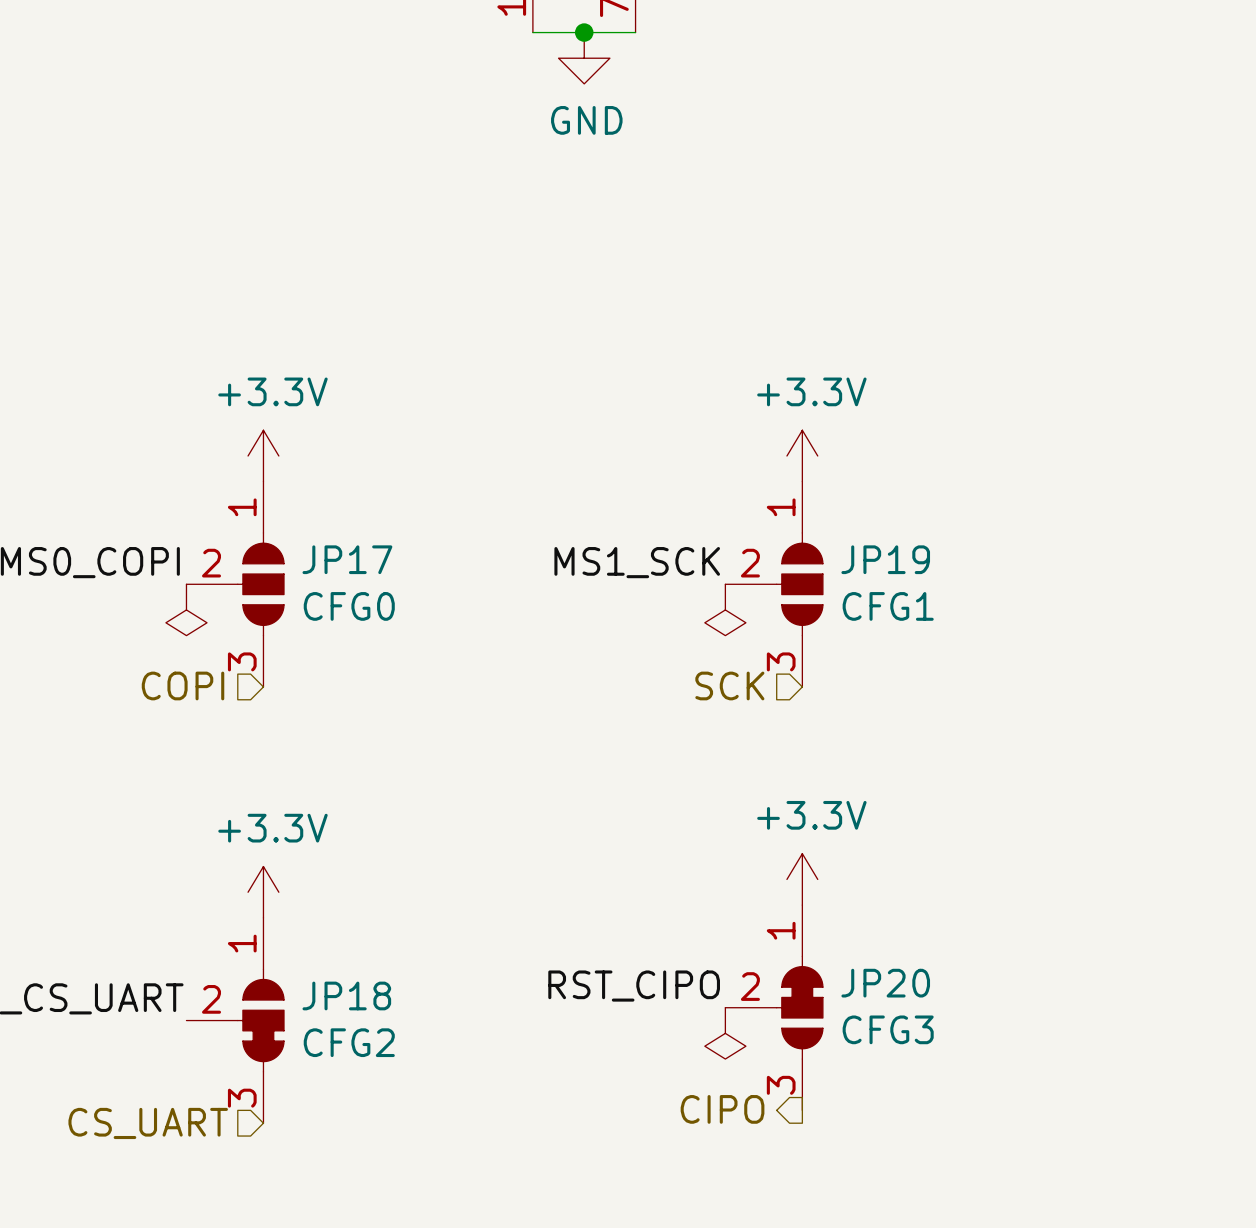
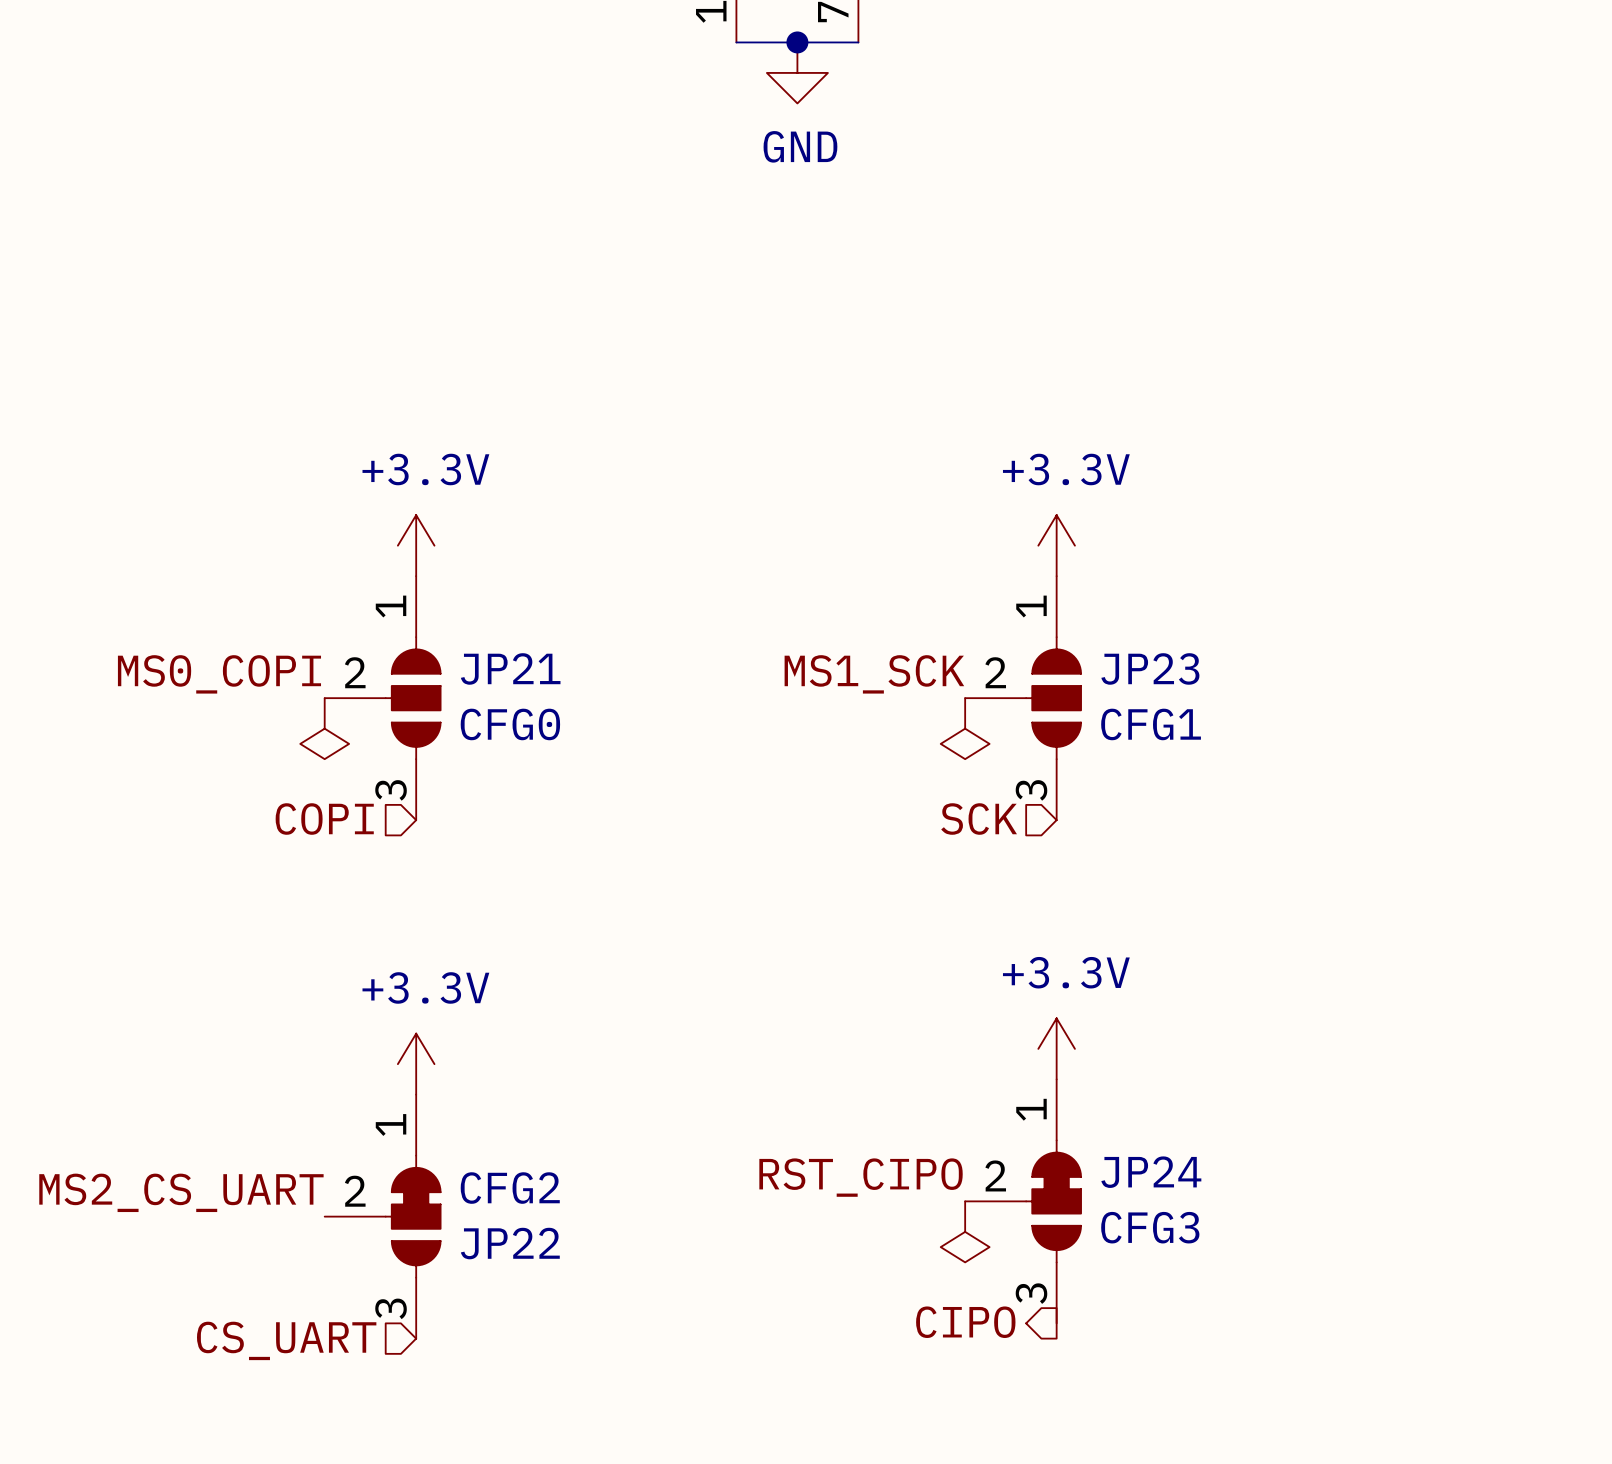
JP17 name: JP17 (347, 559) -> JP21 (510, 668)
JP19 name: JP19 (885, 559) -> JP23 (1150, 668)
JP20 name: JP20 (885, 983) -> JP24 (1151, 1172)
JP18: CFG2 (235, 1020) -> none
JP22: none -> CFG2 (382, 1216)

